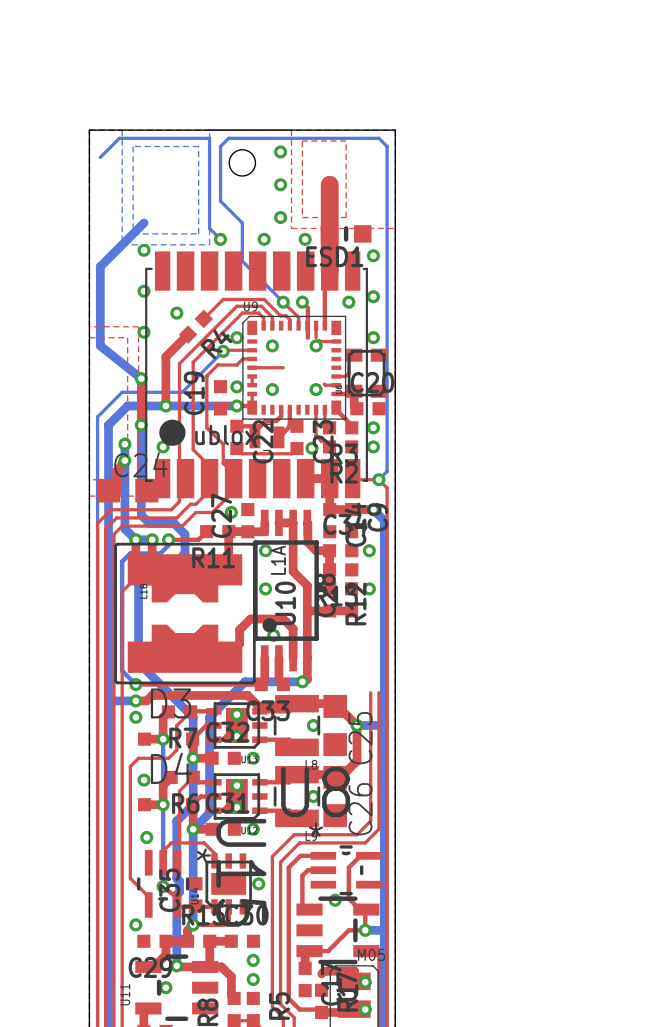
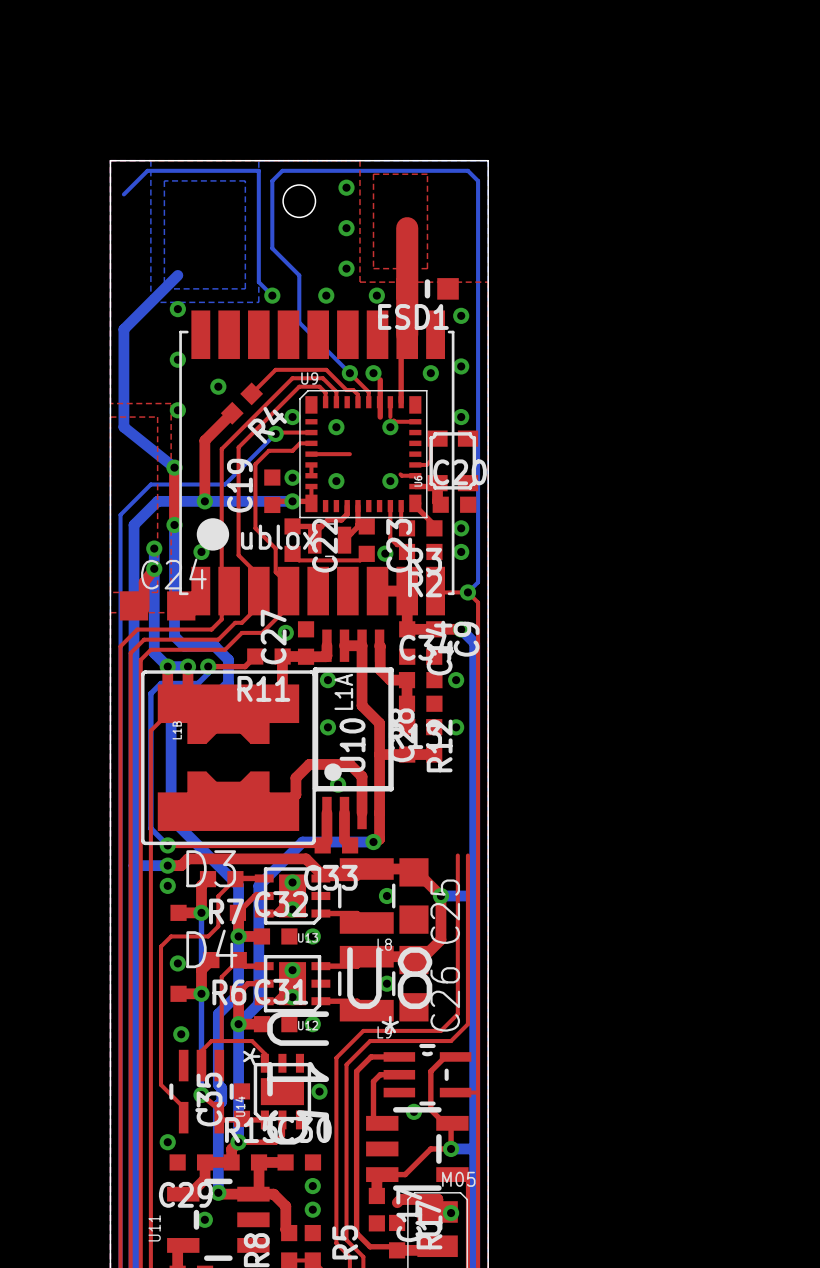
via: (365, 1009) -> none

